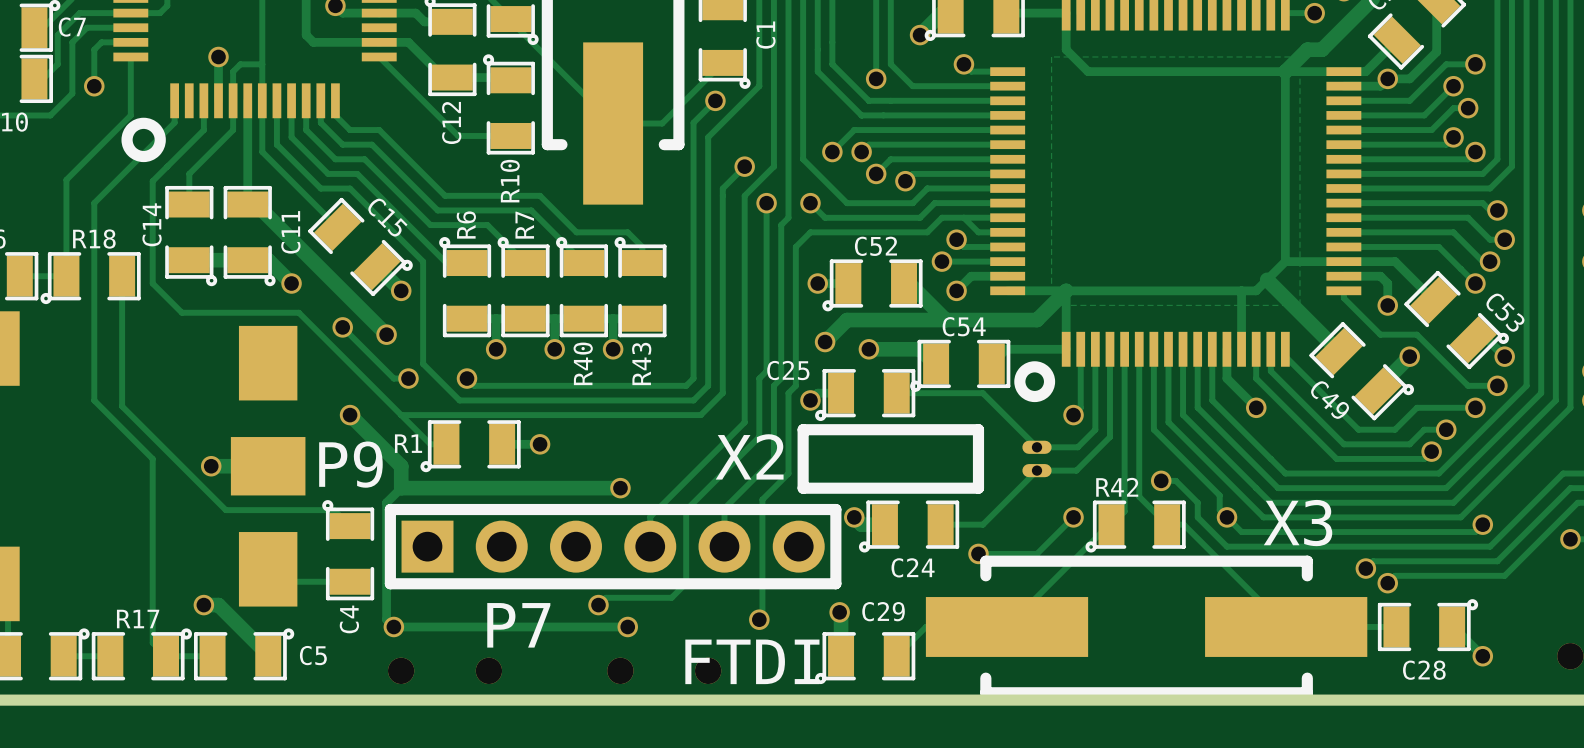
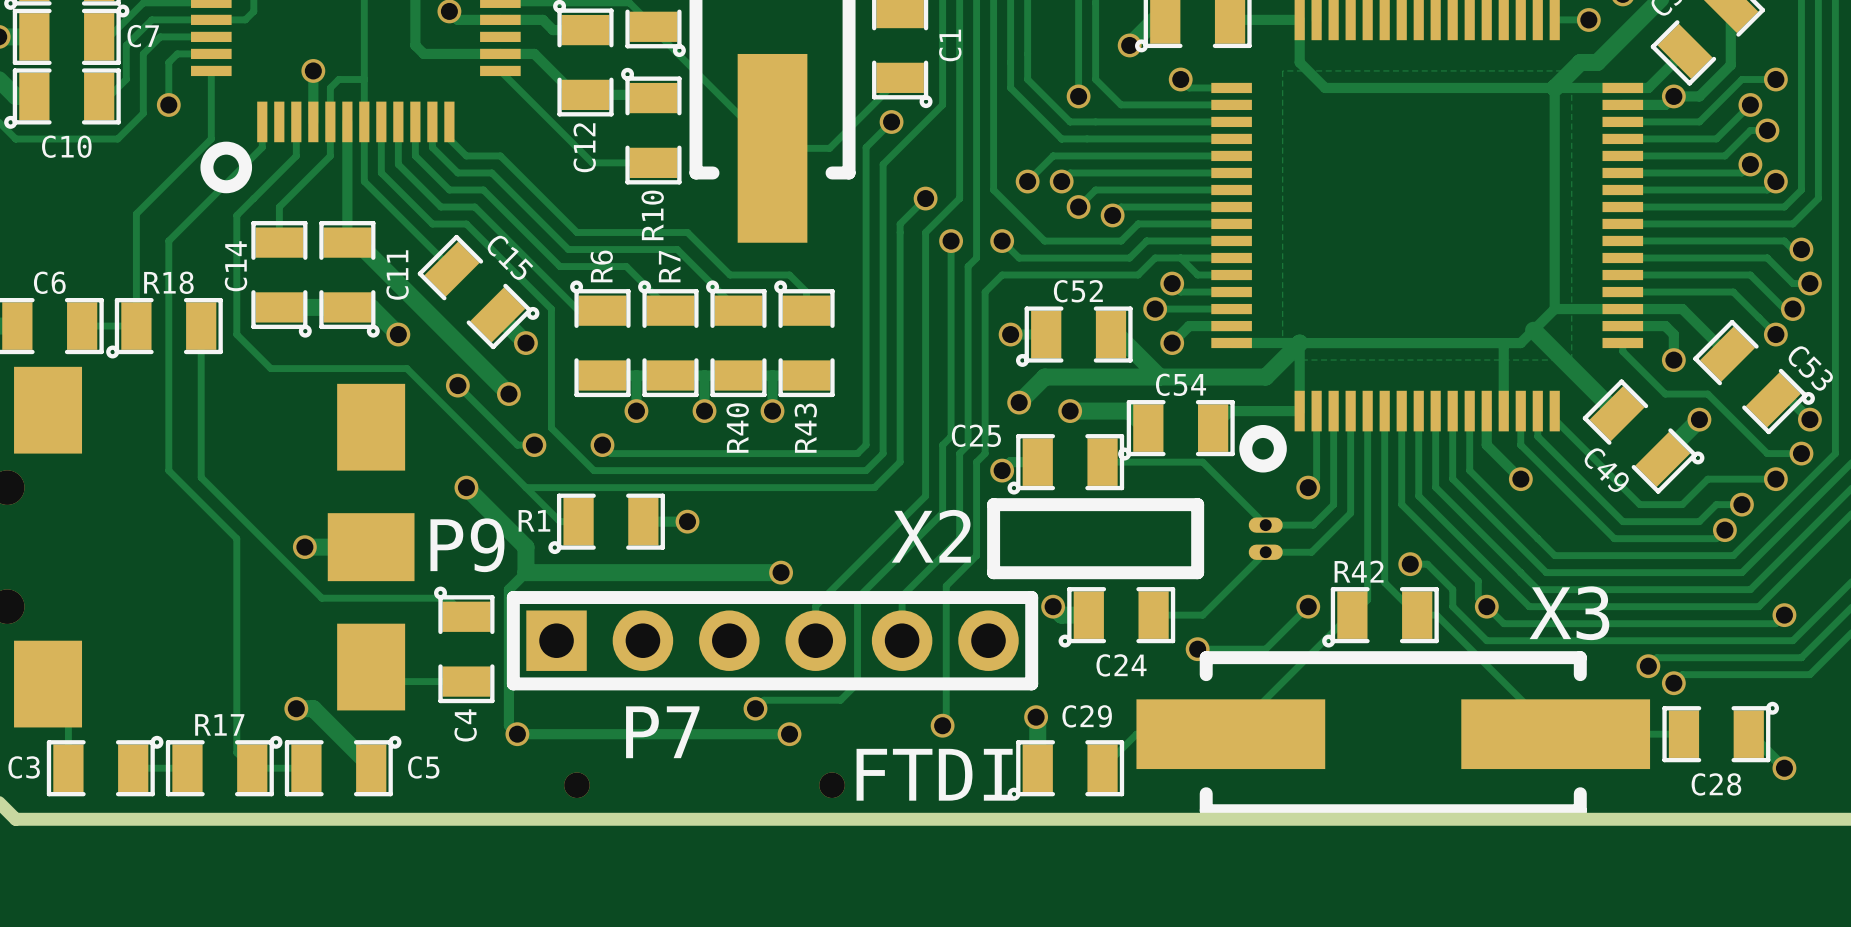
part footprint: [388, 657, 503, 685] -> [564, 772, 590, 798]
part footprint: [607, 657, 722, 685] -> [819, 772, 845, 798]

